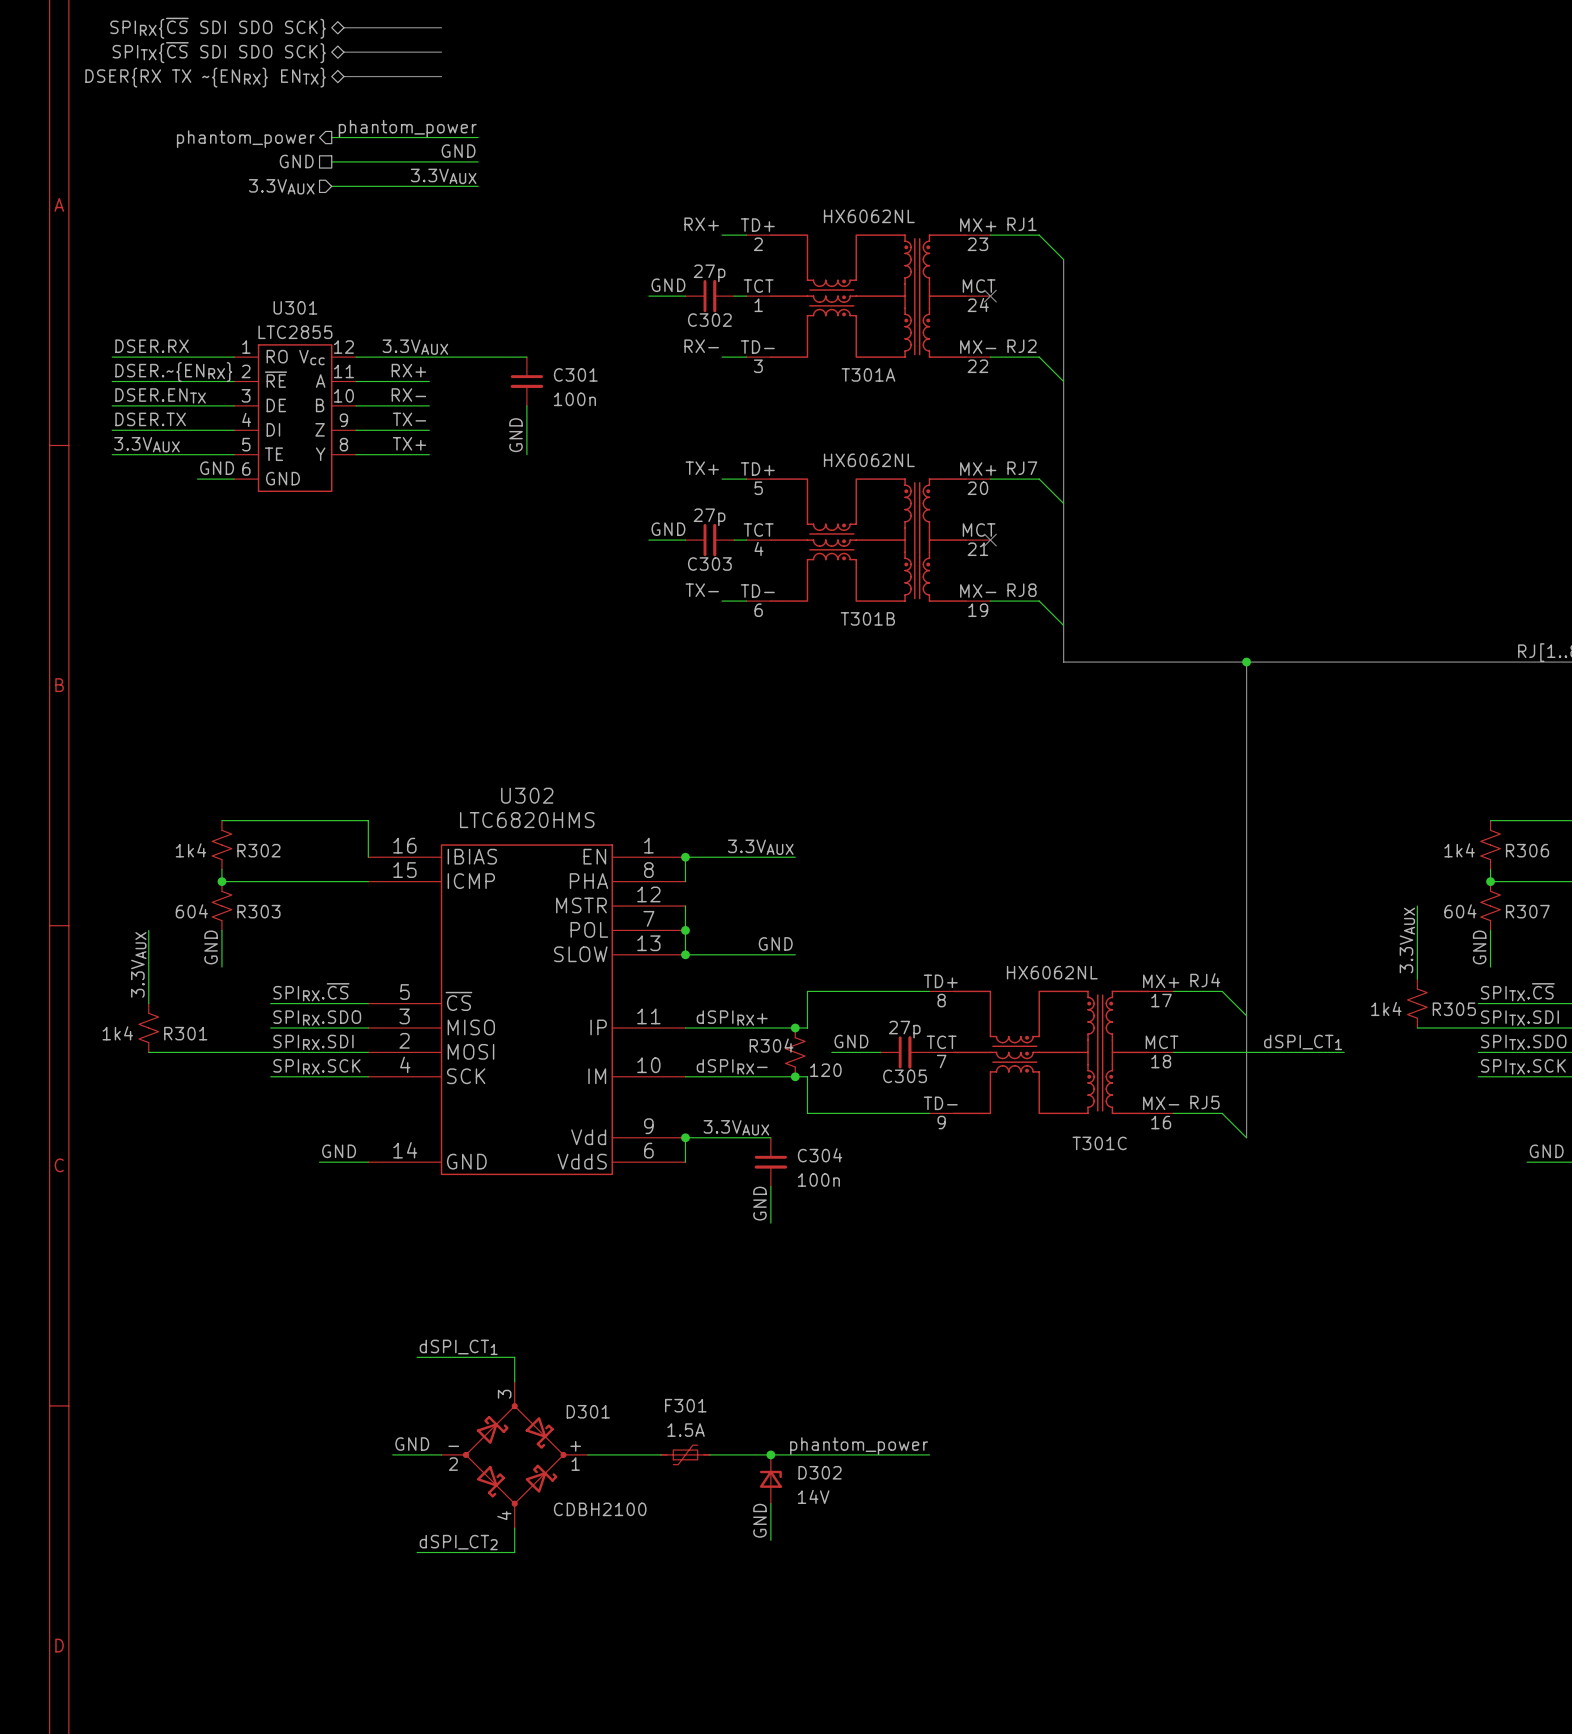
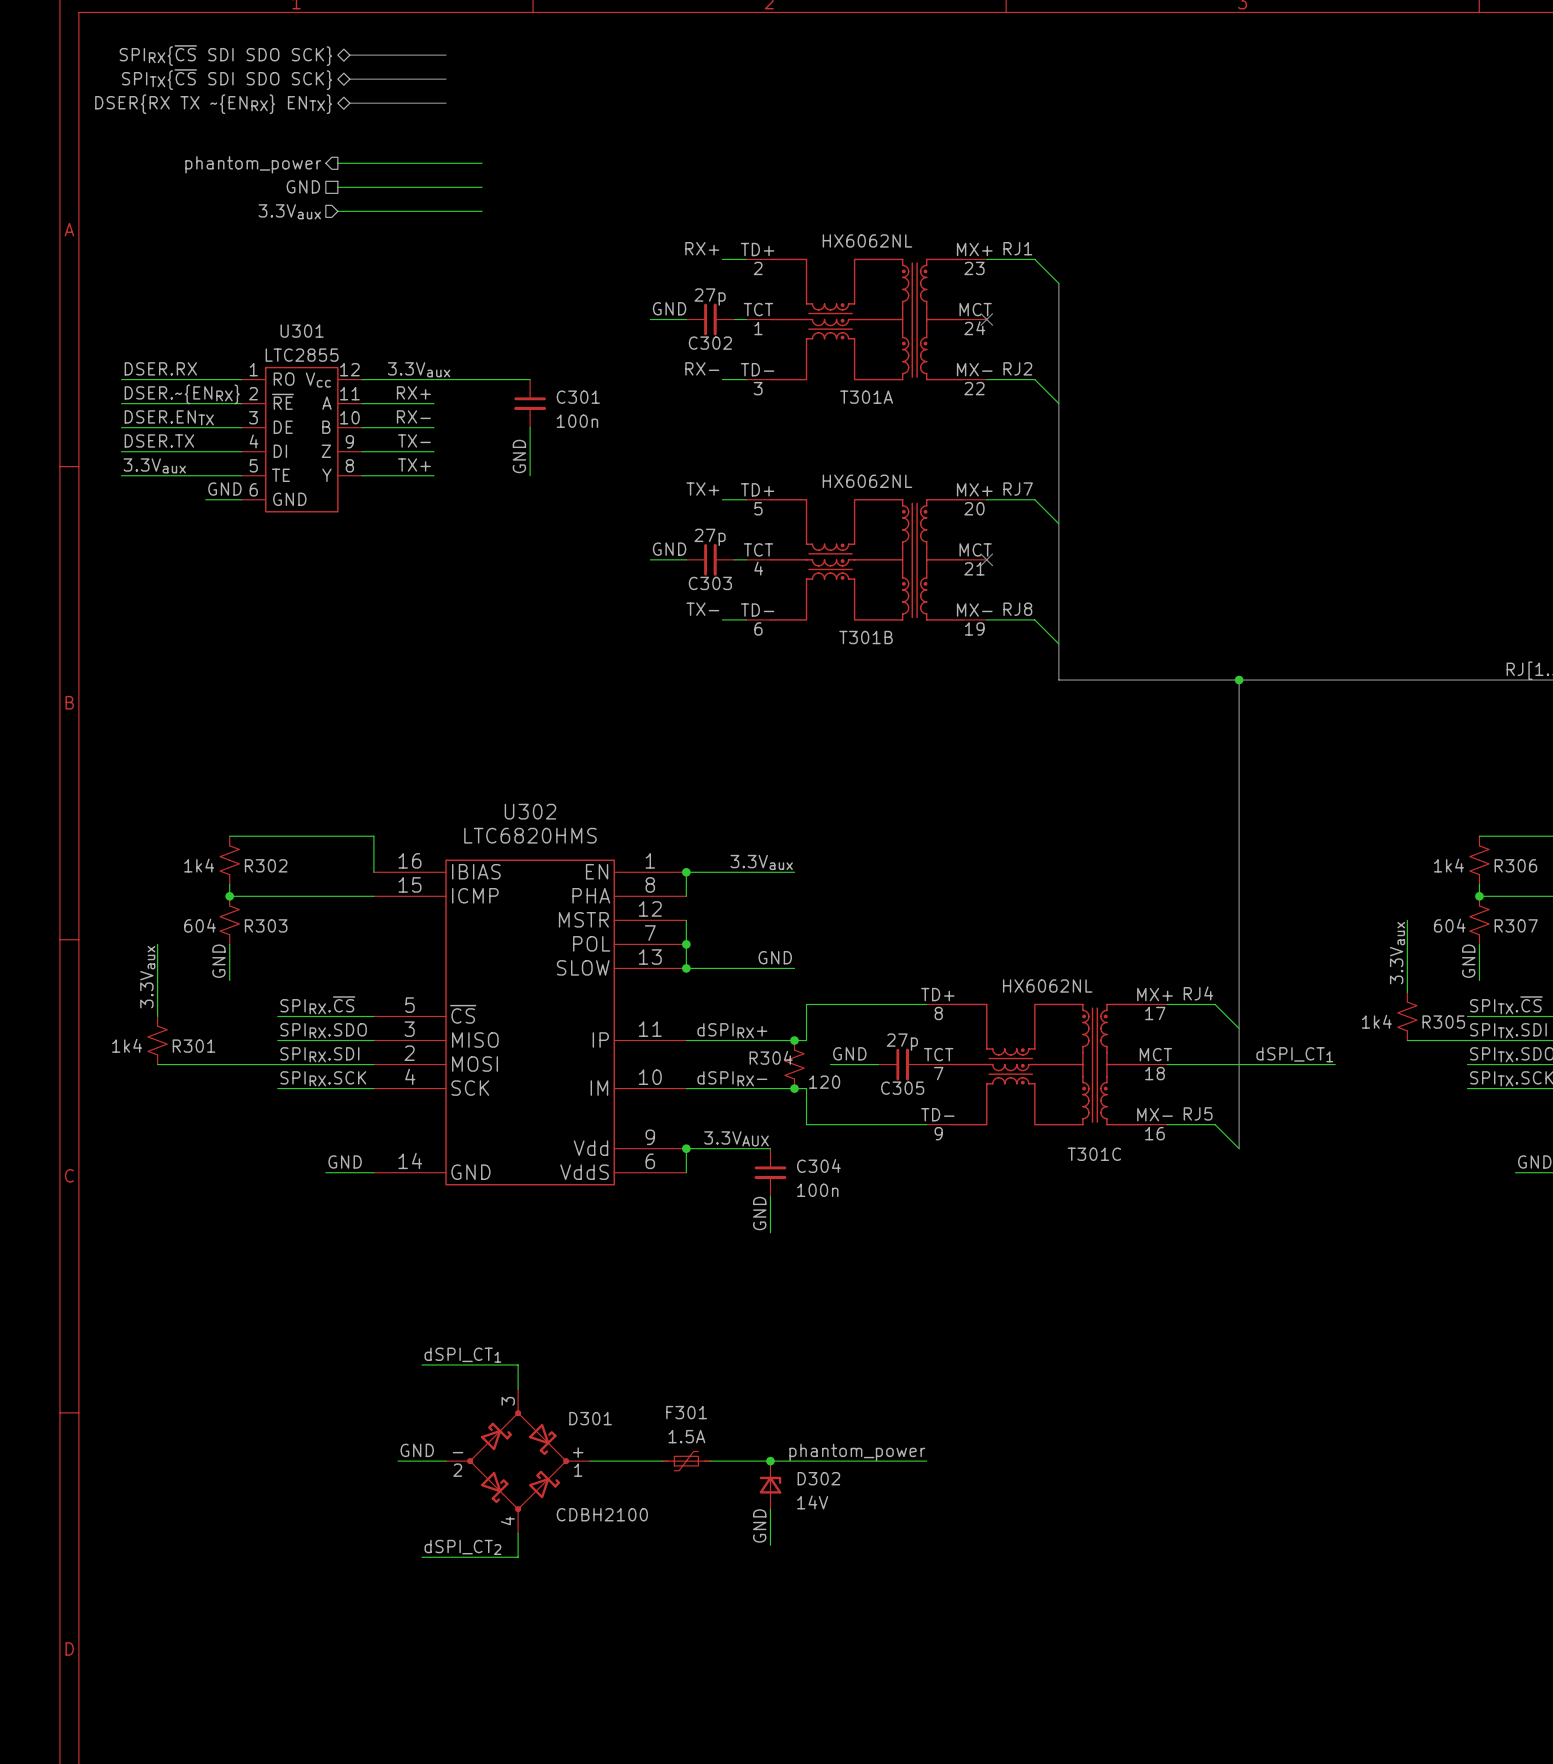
label: phantom_power (407, 128) -> none
label: GND (458, 151) -> none
label: 3.3VAUX (443, 176) -> none
hierarchical label: 3.3VAUX (281, 186) -> 3.3Vaux (289, 211)
label: 3.3VAUX (415, 347) -> 3.3Vaux (419, 369)
label: 3.3VAUX (147, 444) -> 3.3Vaux (154, 465)
label: 3.3VAUX (760, 847) -> 3.3Vaux (761, 862)
label: 3.3VAUX (1407, 940) -> 3.3Vaux (1397, 953)
label: 3.3VAUX (138, 964) -> 3.3Vaux (147, 977)

